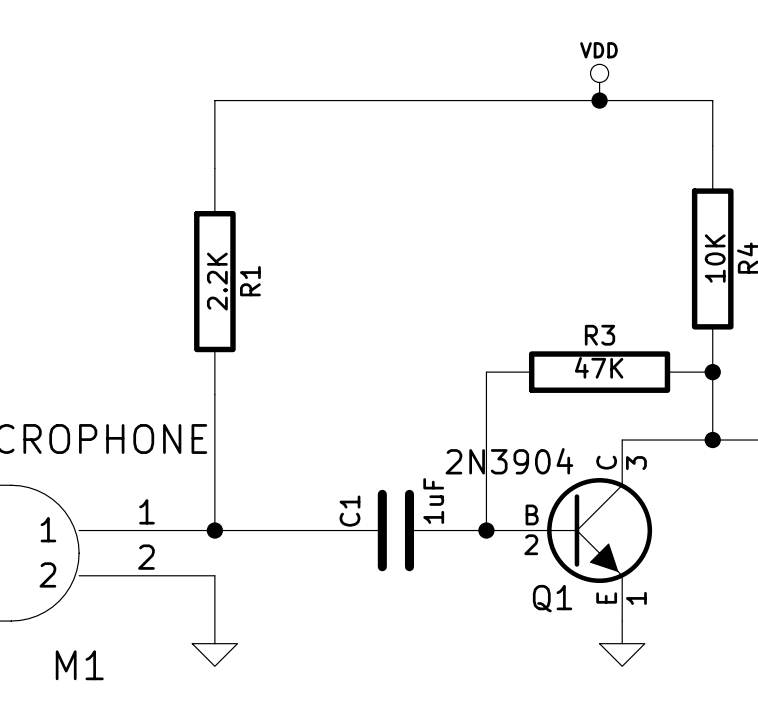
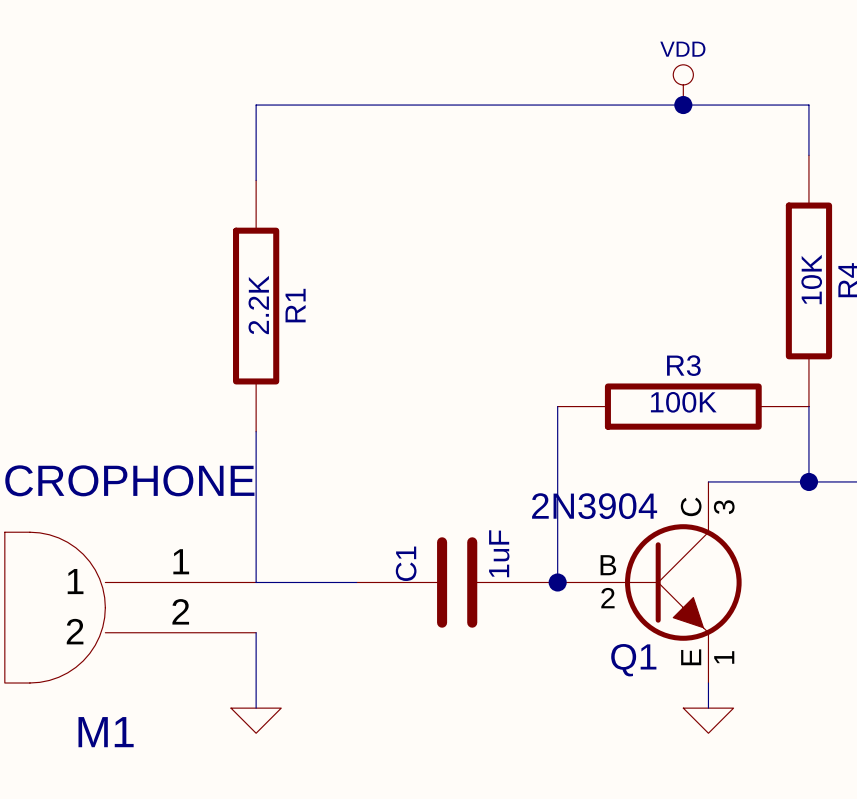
R3 value: 47K (599, 367) -> 100K (683, 402)
junction: (712, 372) -> none
junction: (214, 530) -> none

